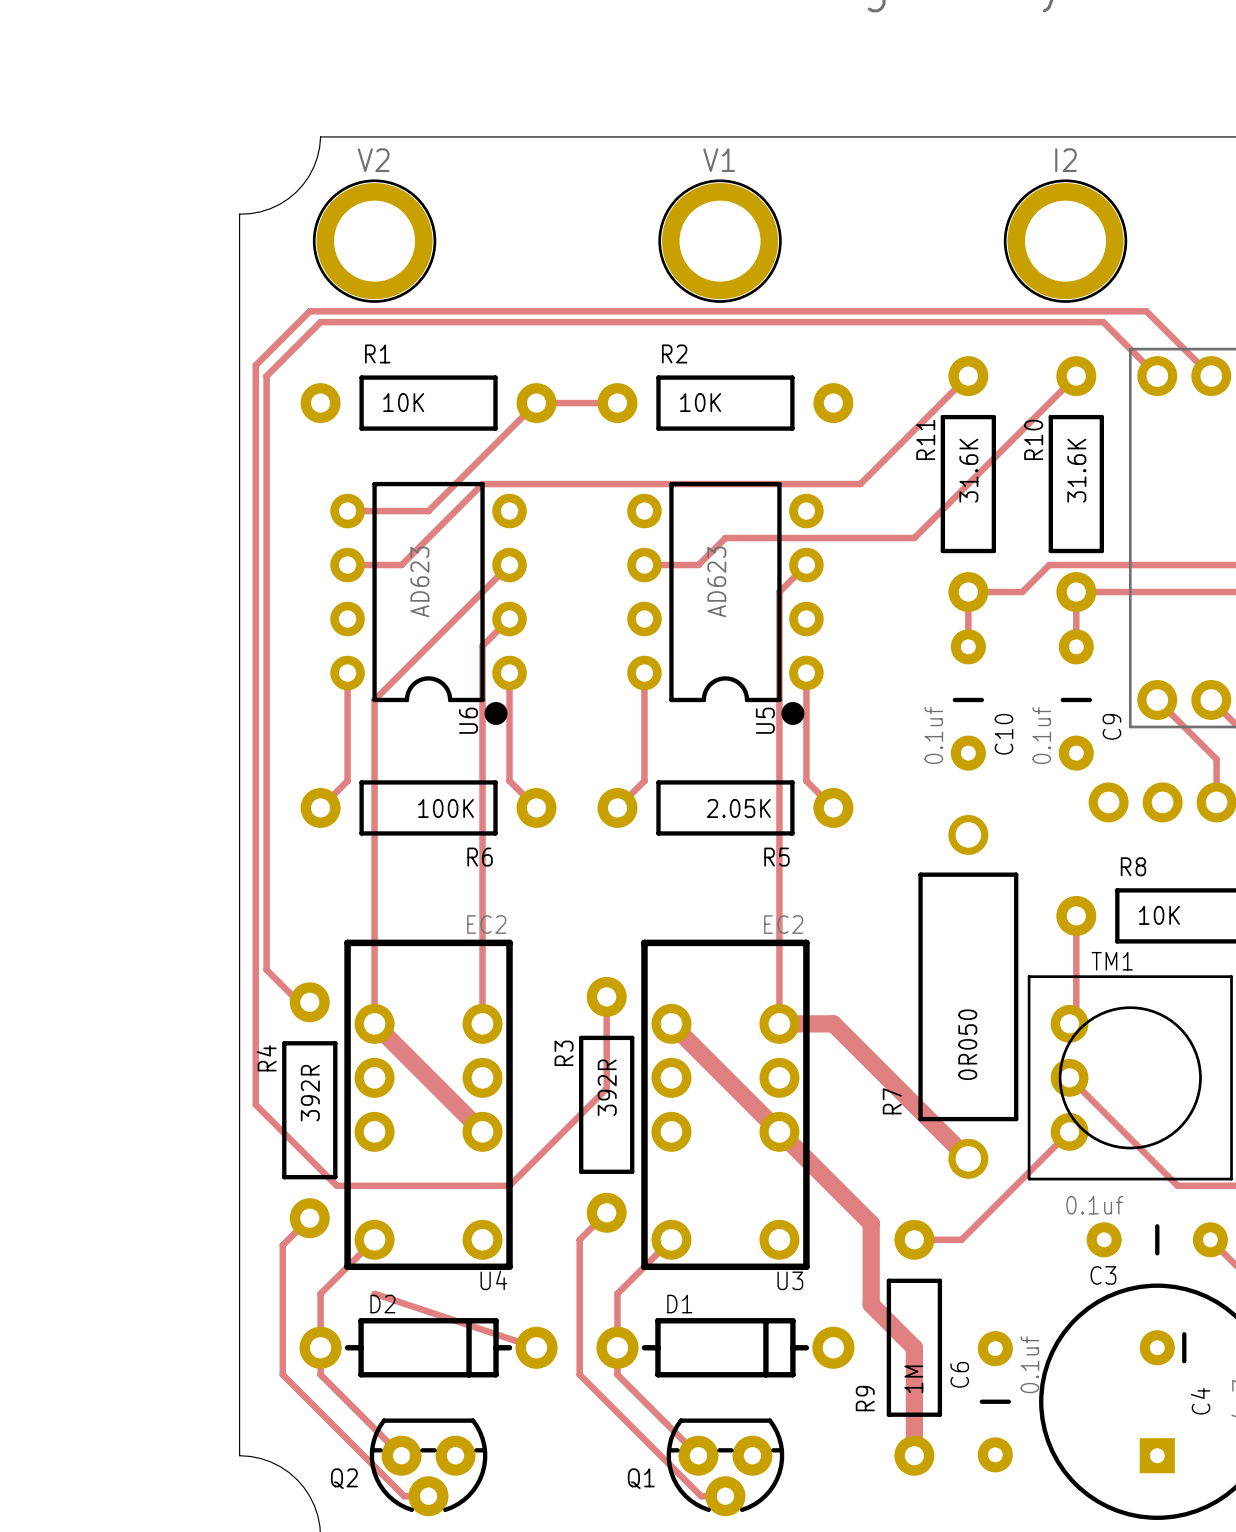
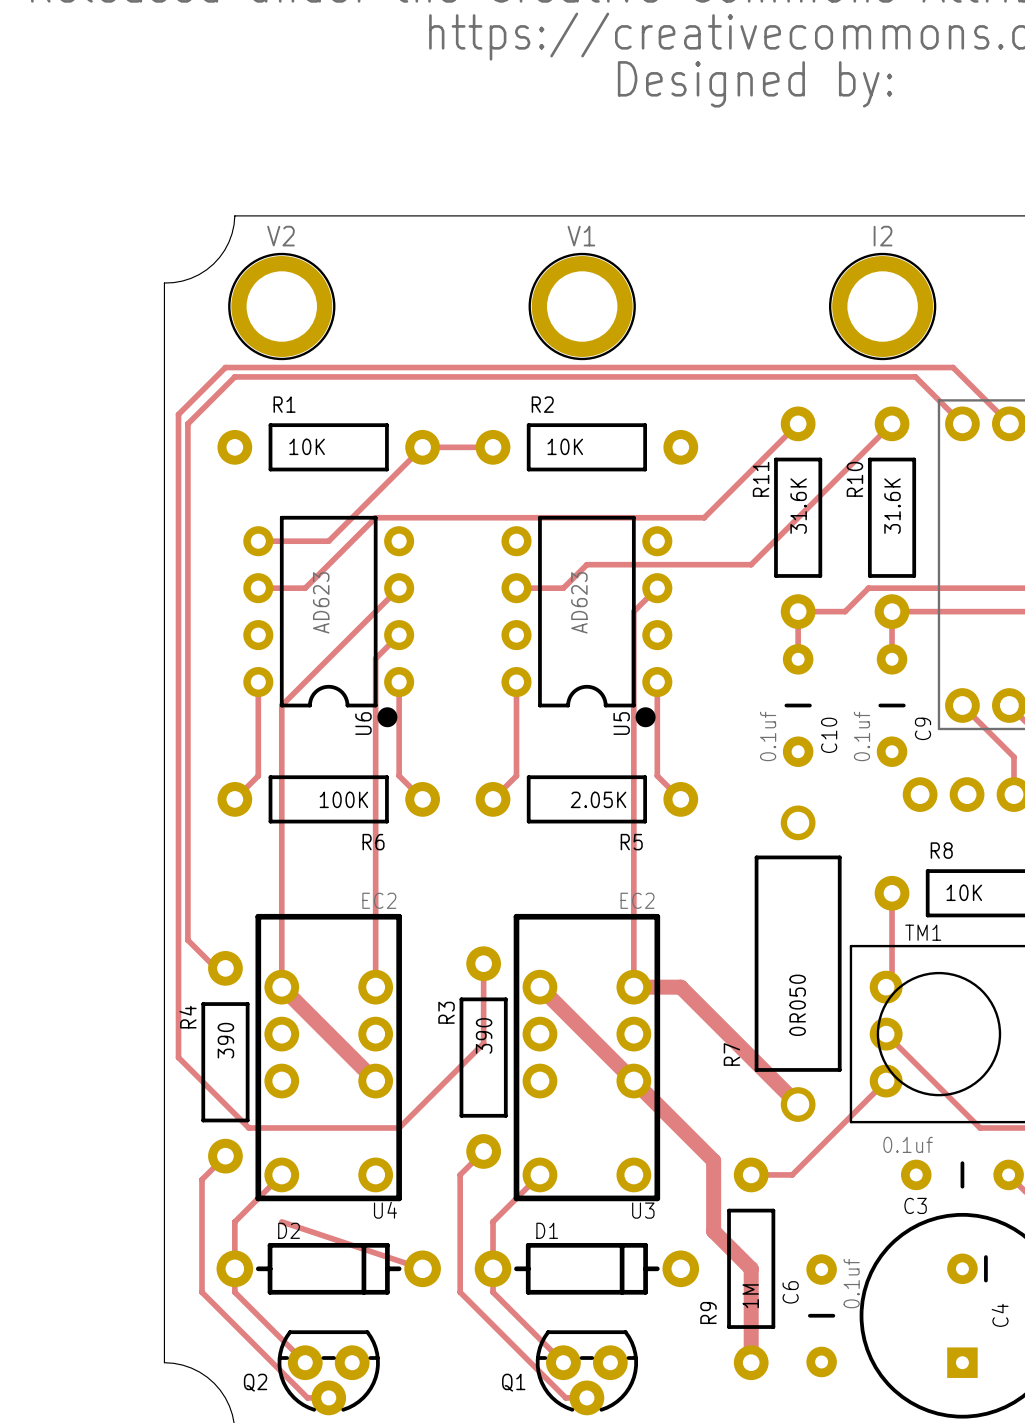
R3 value: 392R (607, 1087) -> 390 (484, 1035)
R4 value: 392R (310, 1093) -> 390 (225, 1040)

